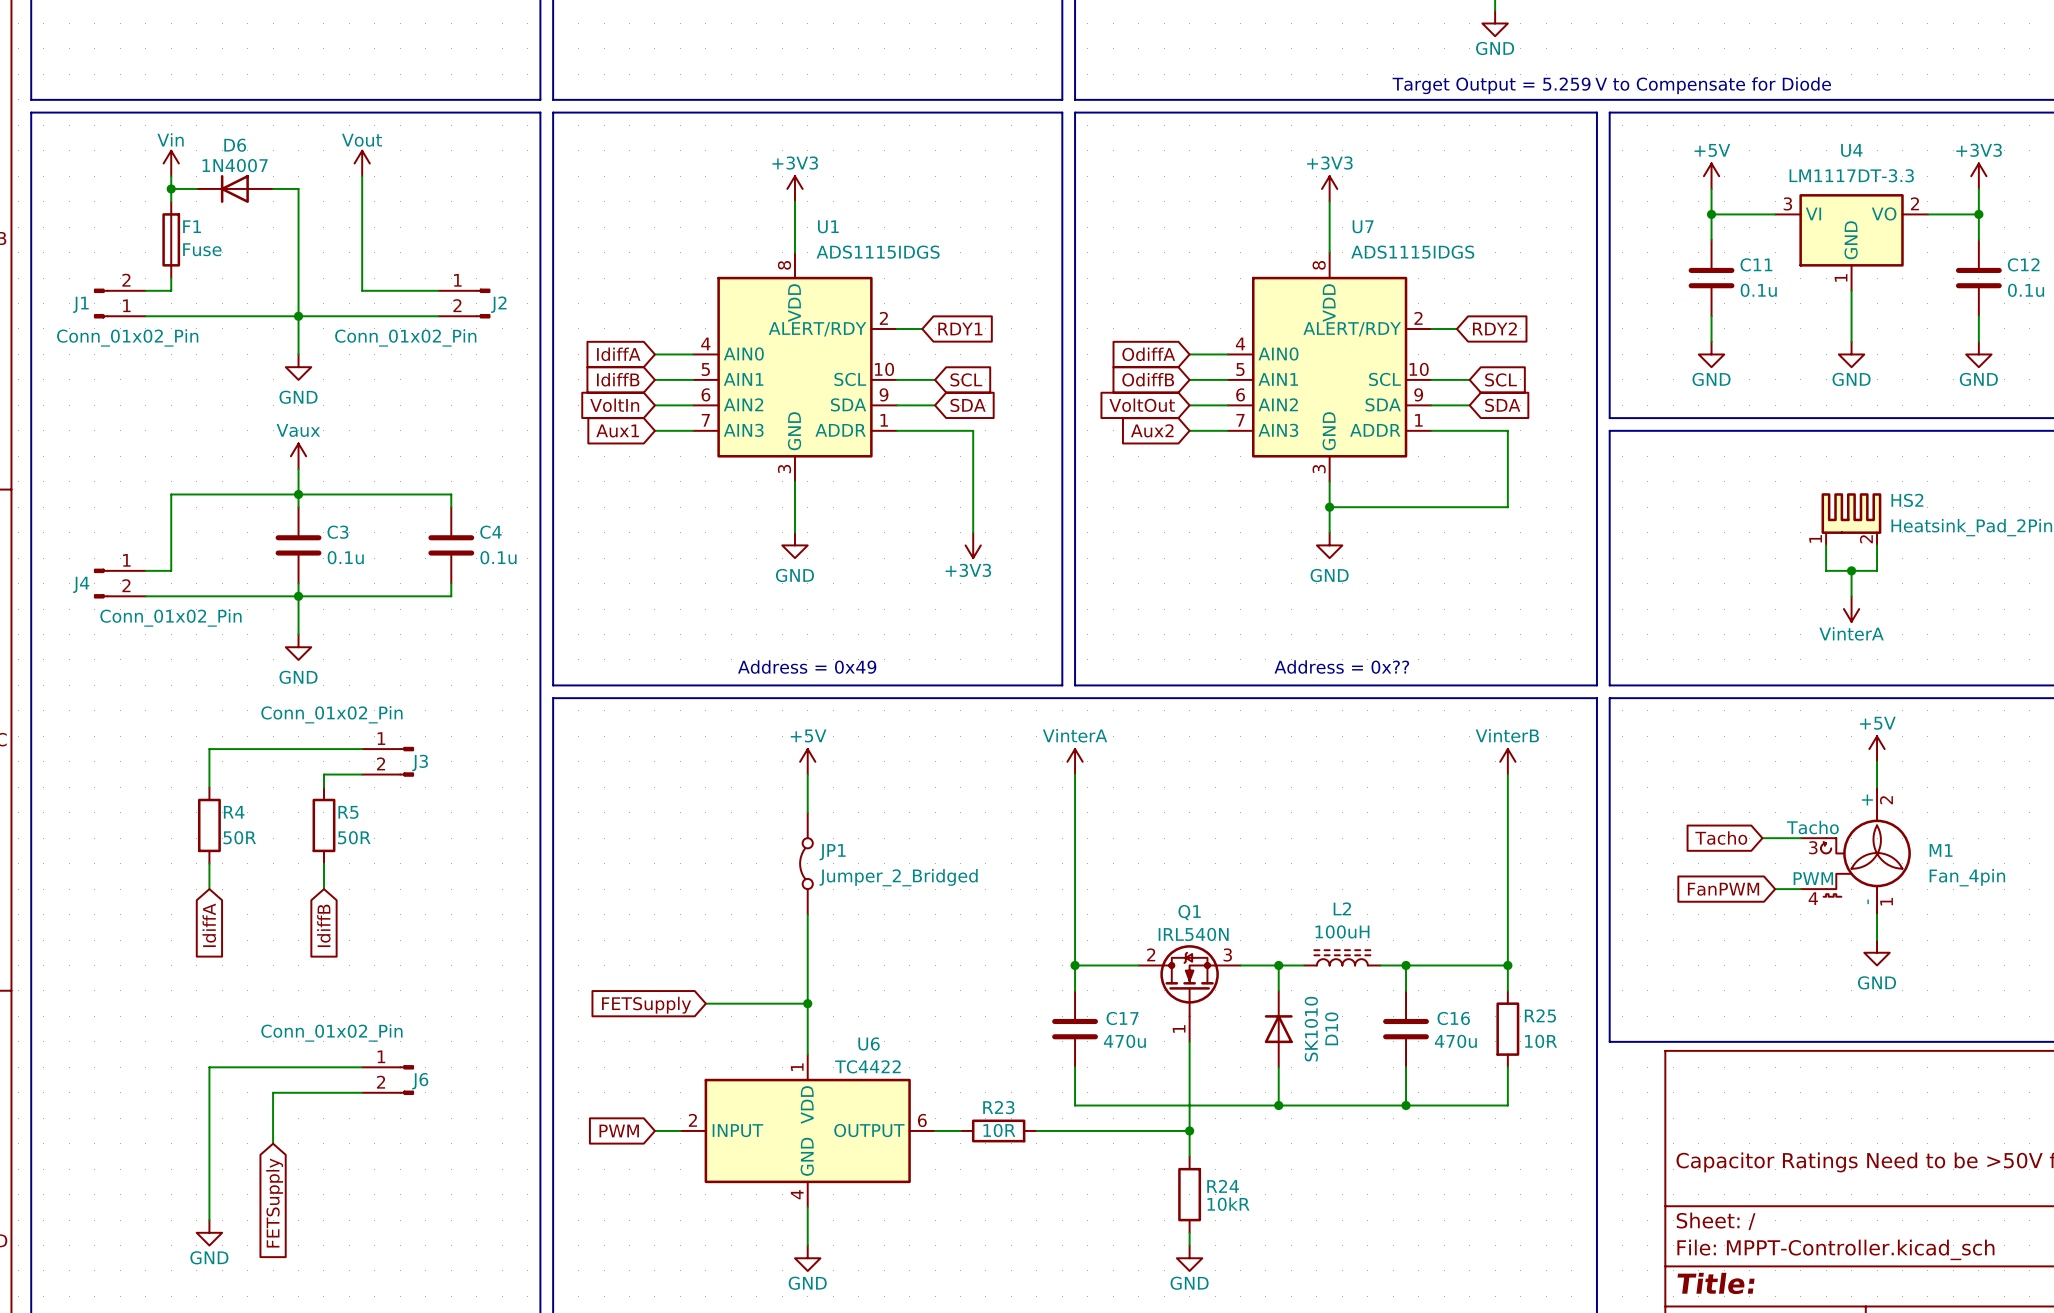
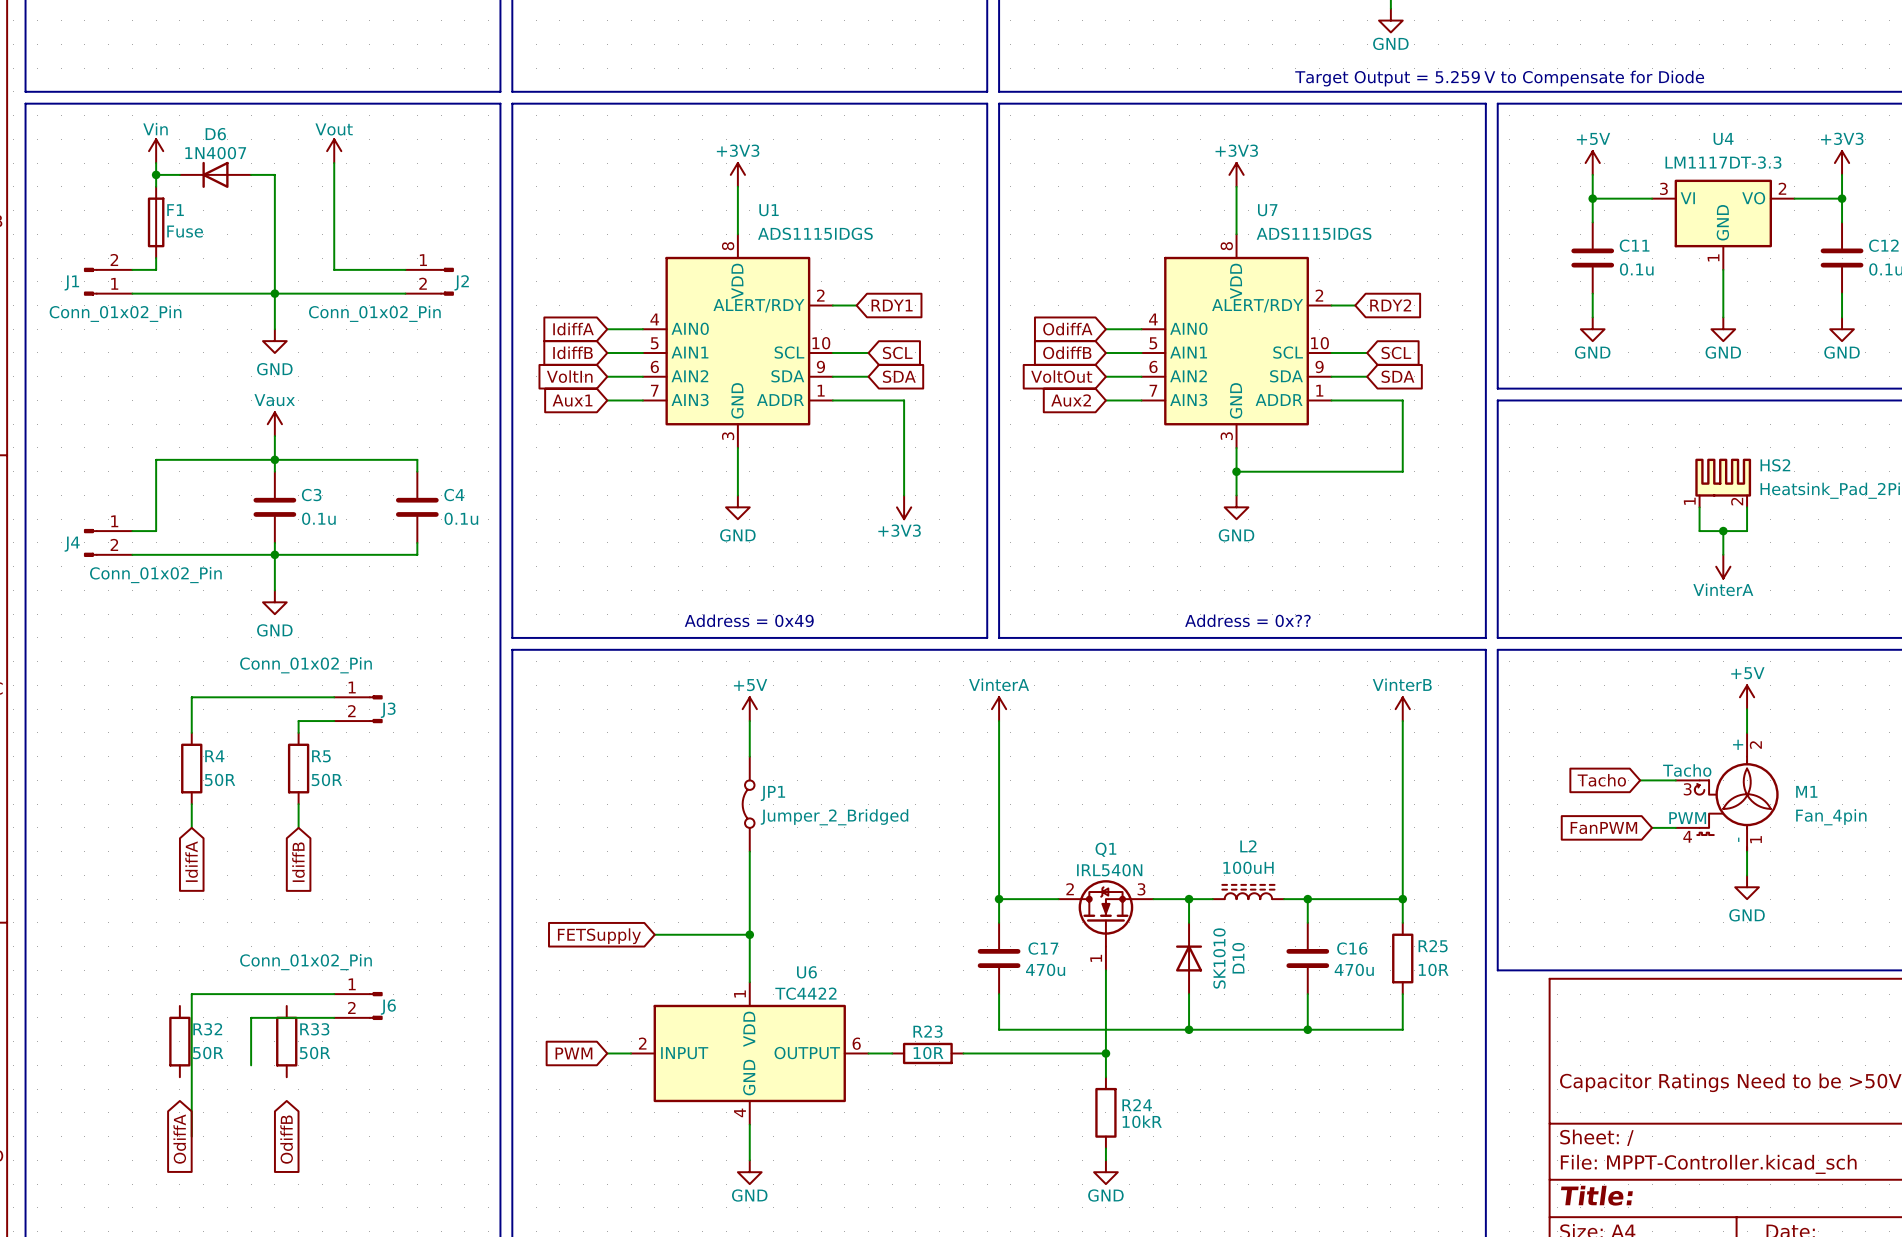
R32: none -> 50R (179, 1041)
R33: none -> 50R (286, 1041)
global label: FETSupply (274, 1203) -> none
global label: none -> OdiffA (179, 1139)
global label: none -> OdiffB (286, 1139)
power symbol: GND (209, 1232) -> none

